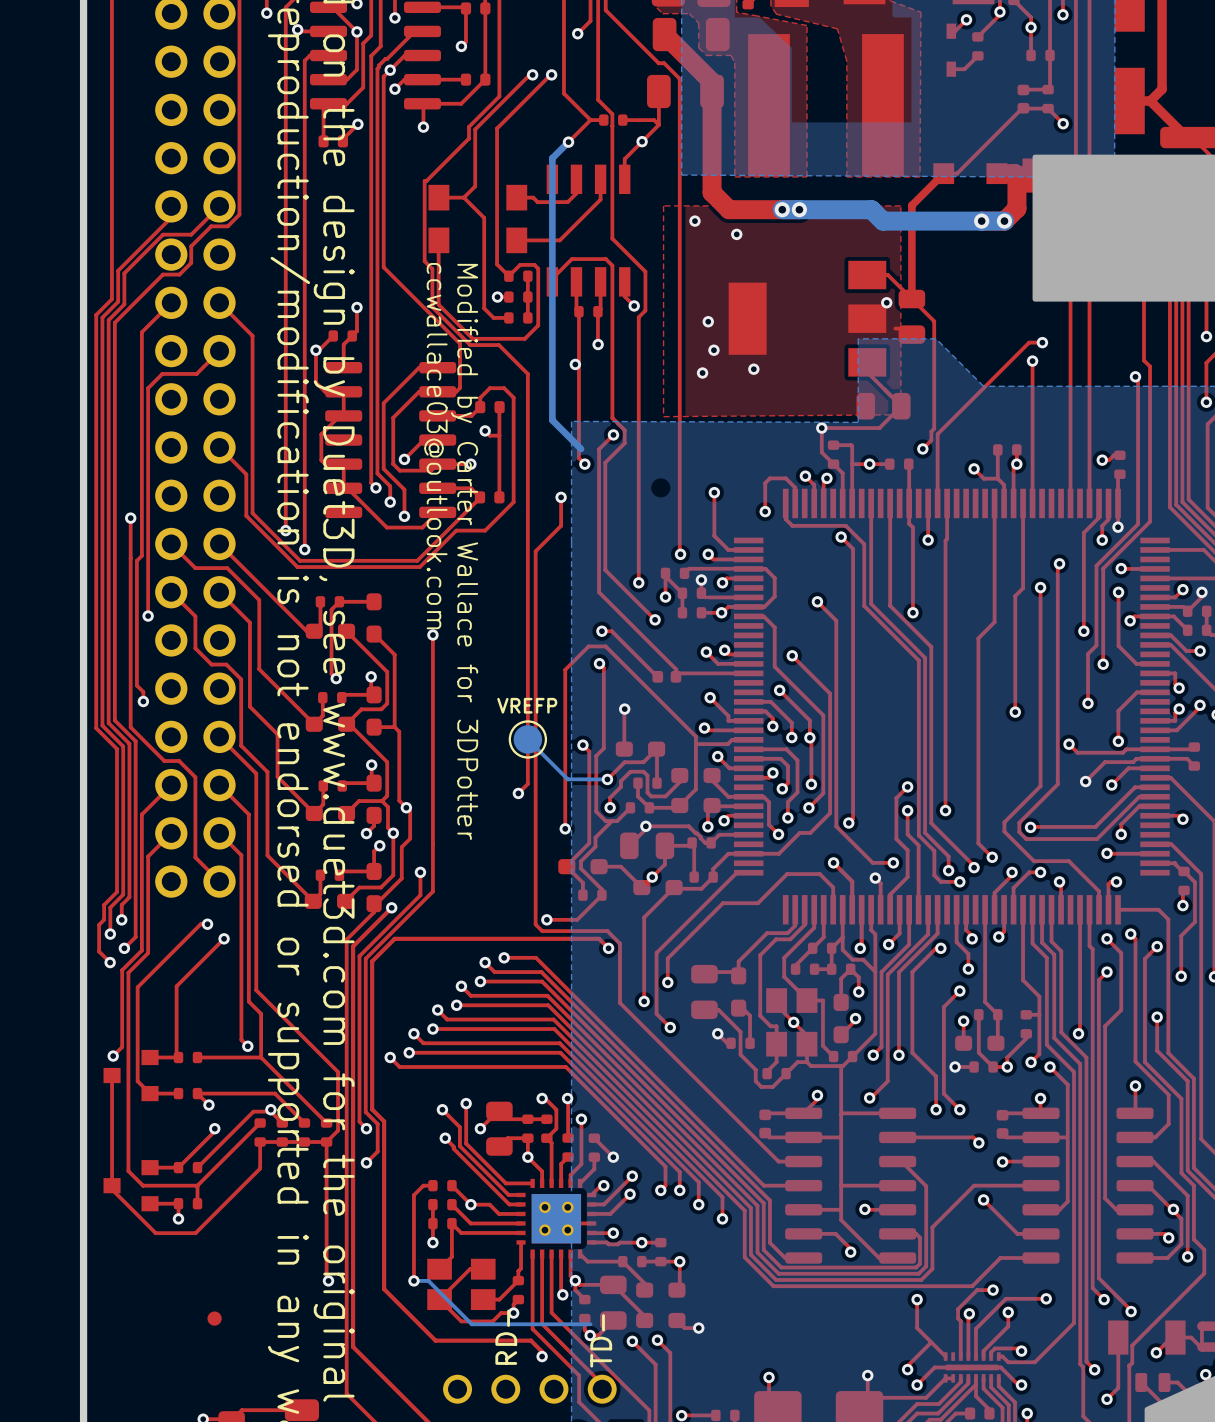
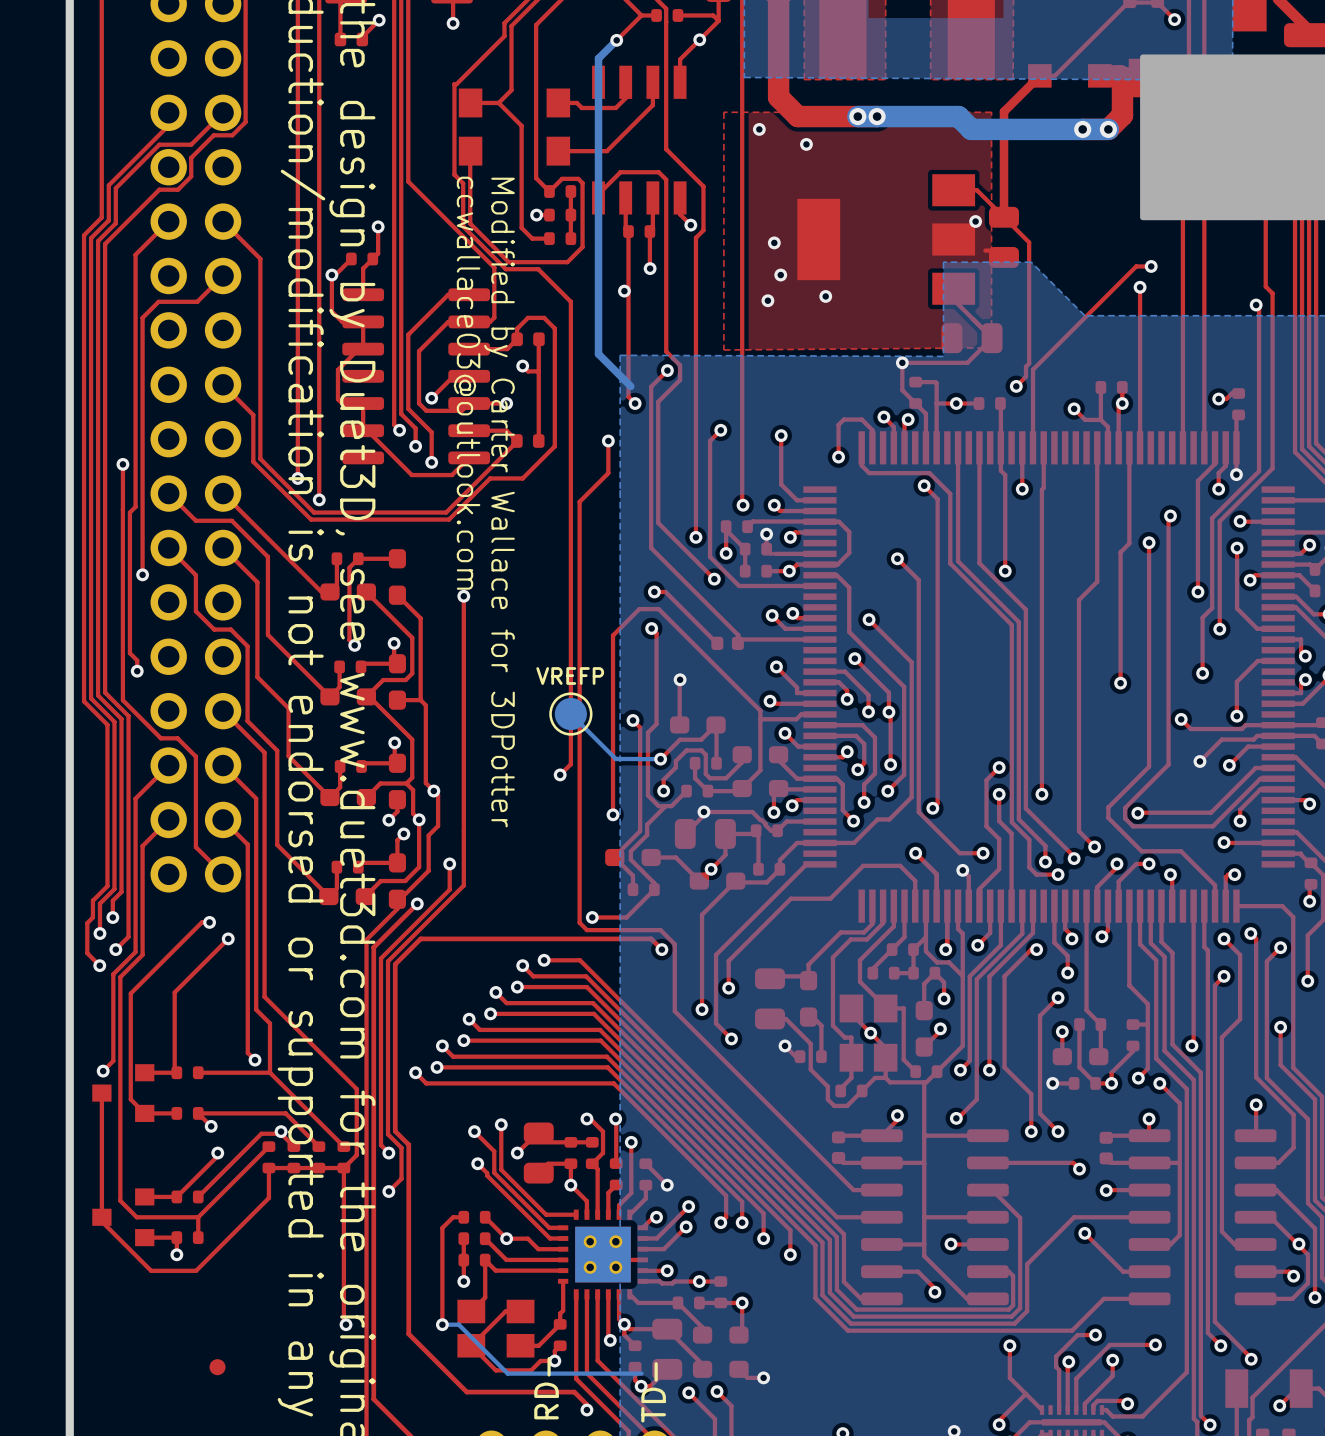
top track: none -> (720, 430) (710, 441) (710, 556) (739, 585) (819, 585)
via: none -> (720, 430)

